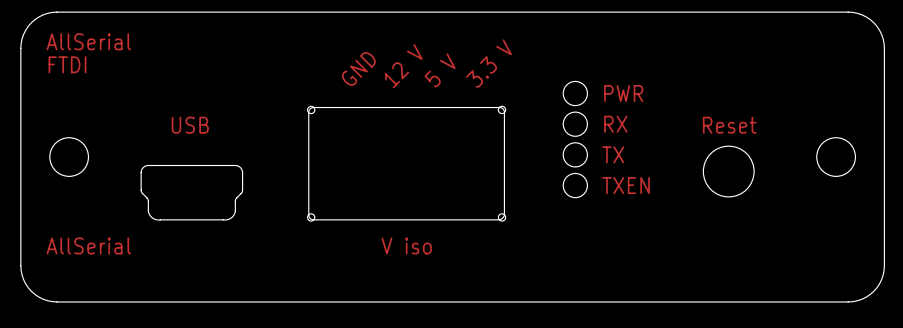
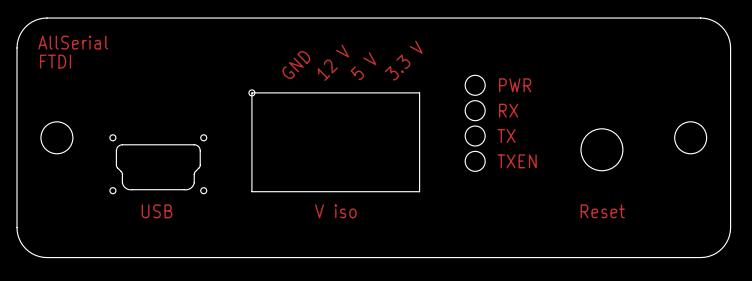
board edge: none -> (251, 92) (251, 191) (419, 191) (419, 92) (251, 92)
hole: none -> (251, 92)
text position: USB (190, 125) -> USB (156, 211)
text position: Reset (729, 125) -> Reset (602, 211)
hole: none -> (112, 137)
hole: none -> (203, 137)
part: (452, 157) -> none
part: (406, 163) -> none
hole: none -> (112, 190)
hole: none -> (203, 190)

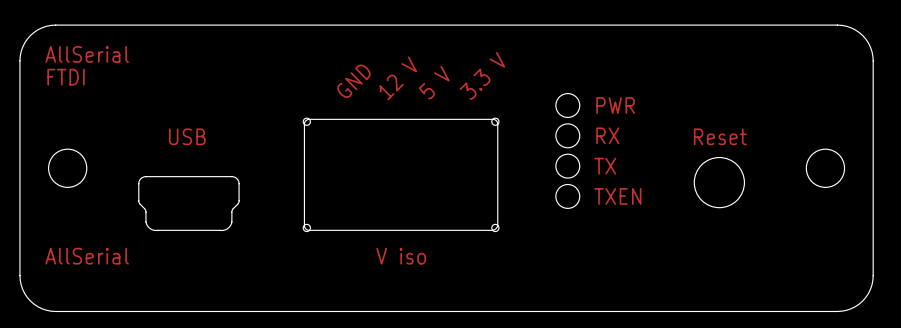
board edge: (251, 92) (251, 191) (419, 191) (419, 92) (251, 92) -> none
hole: (251, 92) -> none
hole: (112, 137) -> none
hole: (203, 137) -> none
part: none -> (446, 168)
part: none -> (401, 174)
hole: (112, 190) -> none
hole: (203, 190) -> none
text position: USB (156, 211) -> USB (187, 136)
text position: Reset (602, 211) -> Reset (720, 136)

